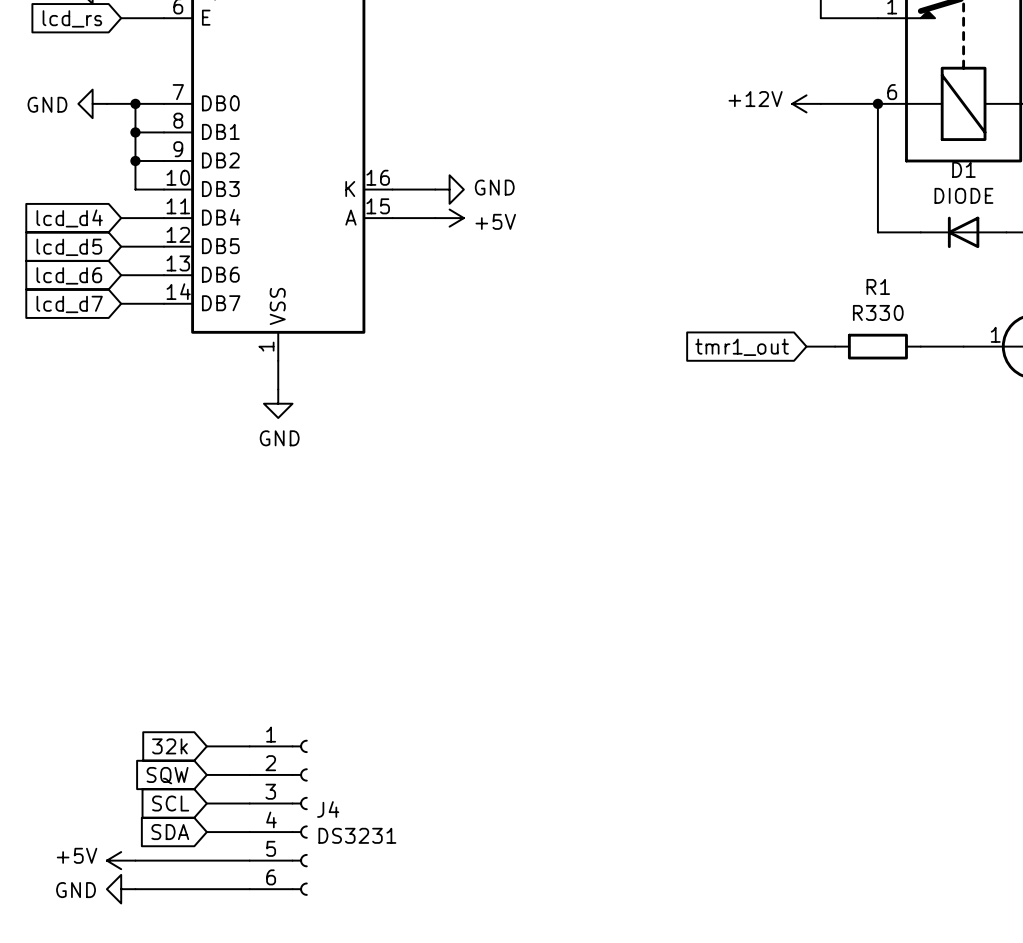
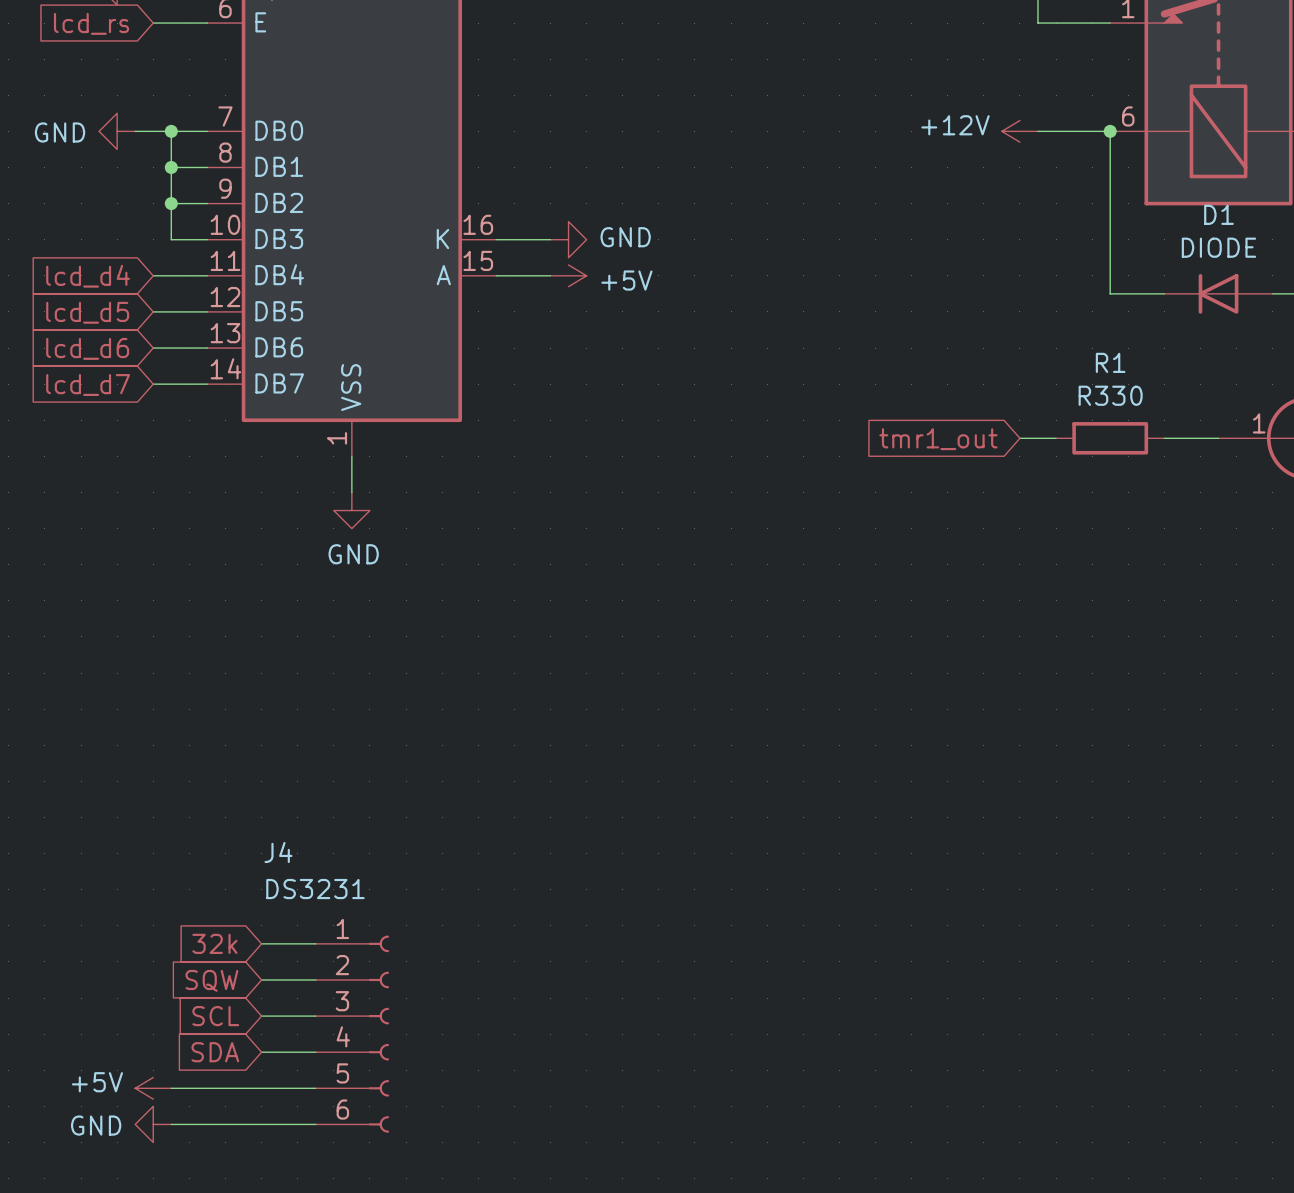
J4 name position: J4 (328, 809) -> J4 (278, 852)
J4 value position: DS3231 (357, 835) -> DS3231 (315, 889)

